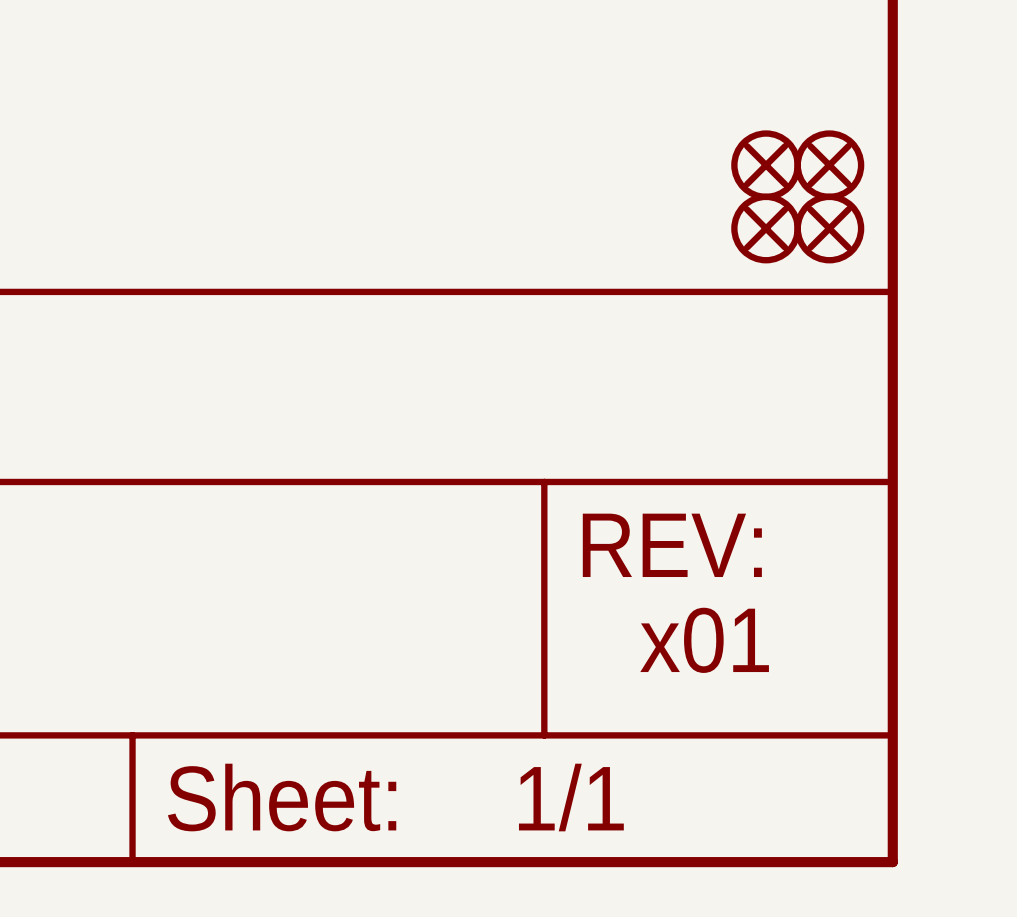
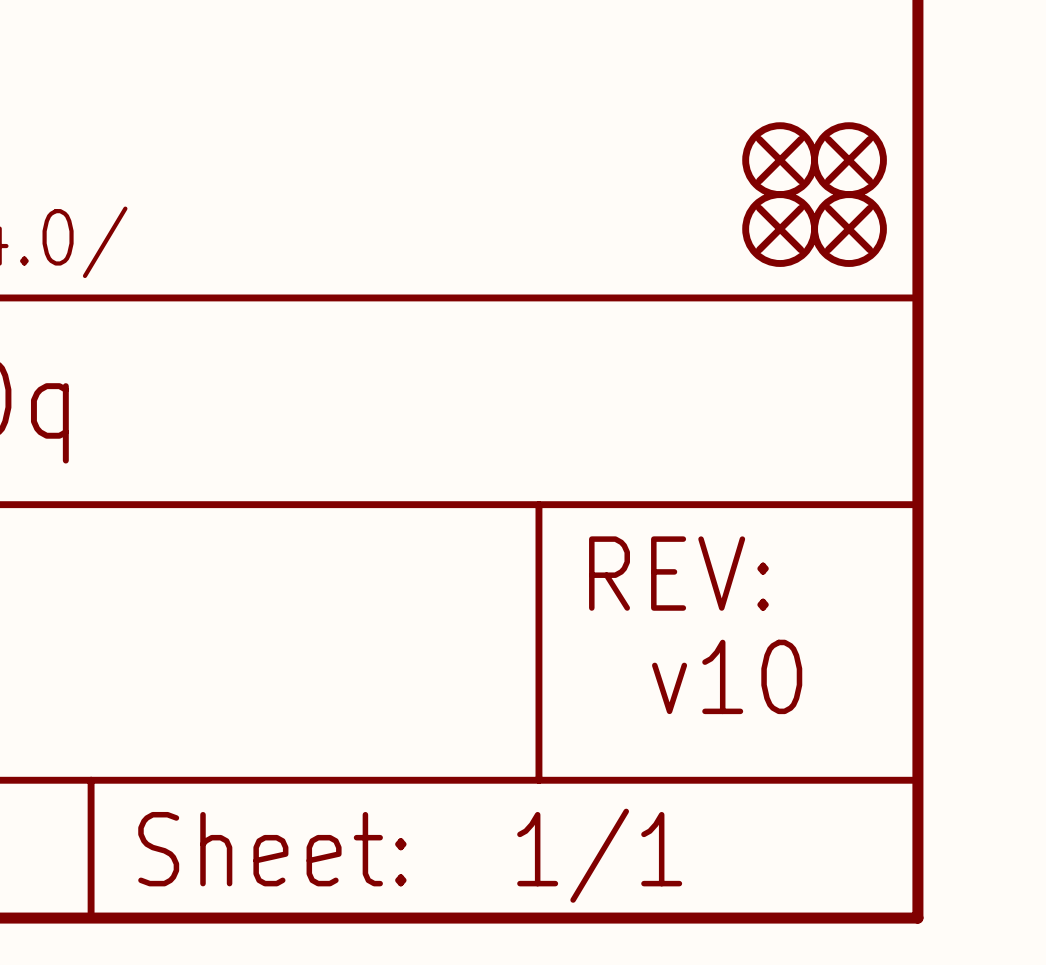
text: x01 (704, 640) -> v10 (727, 676)

